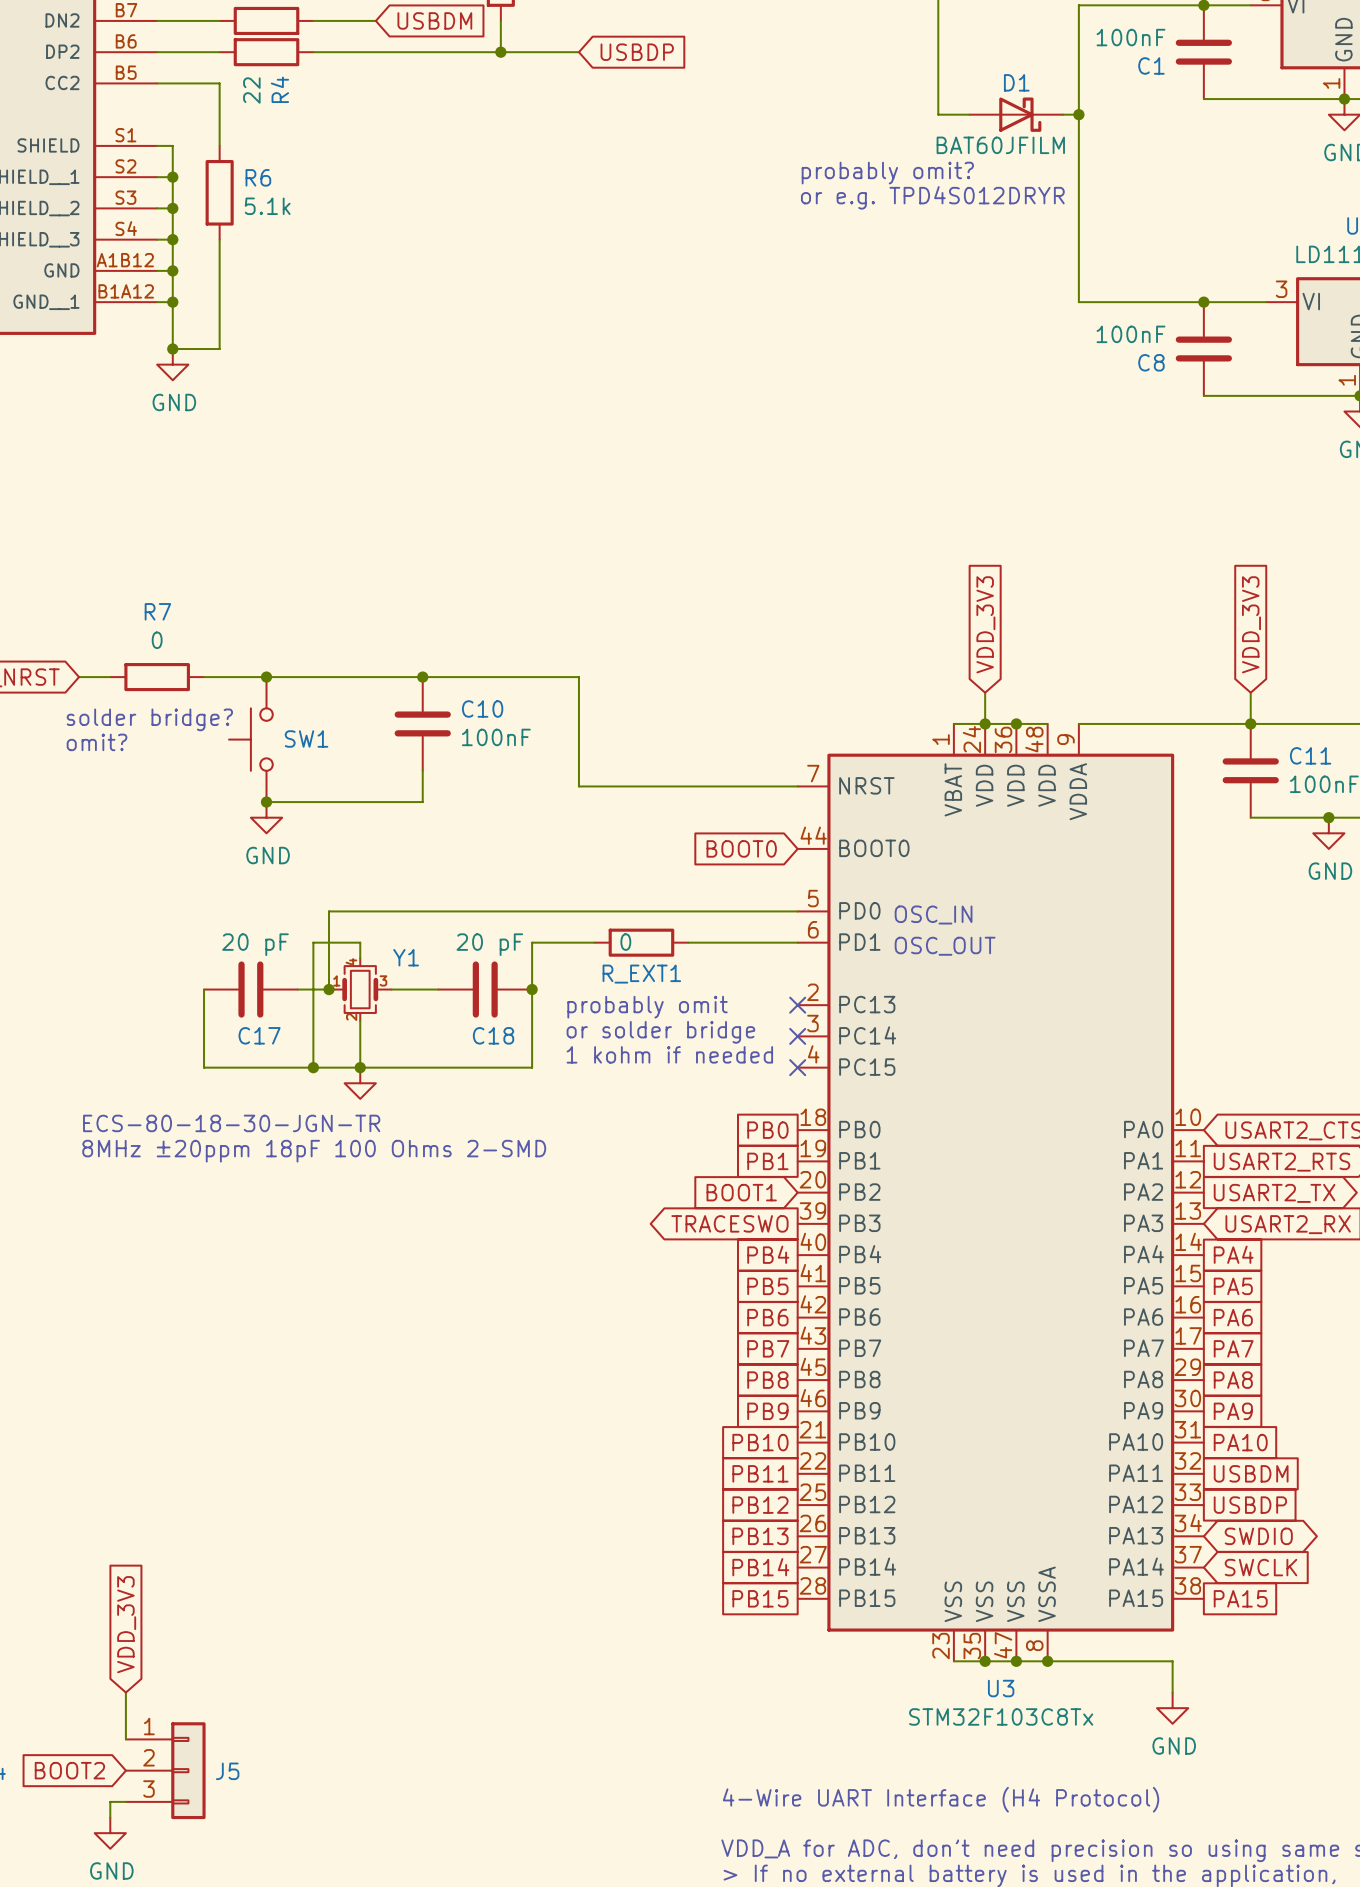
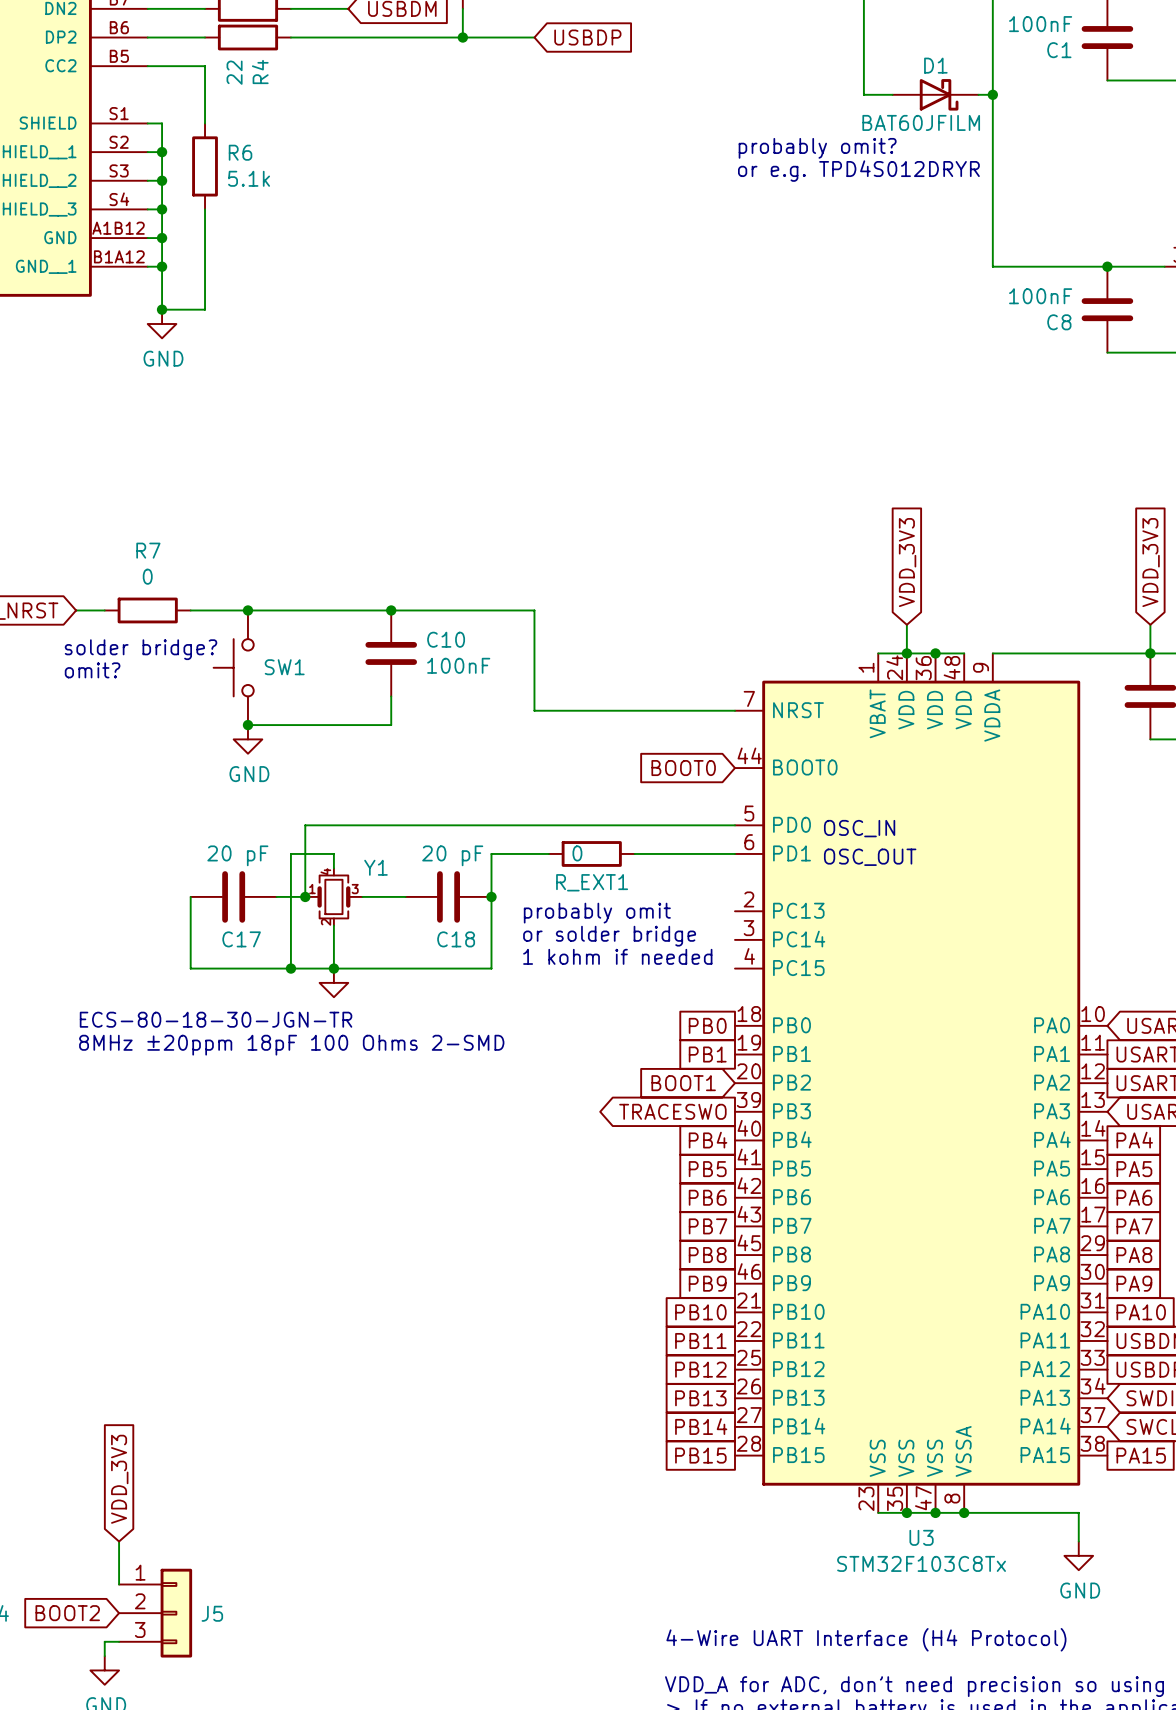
no-connect mark: (797, 1005) -> none
no-connect mark: (797, 1036) -> none
no-connect mark: (797, 1067) -> none

